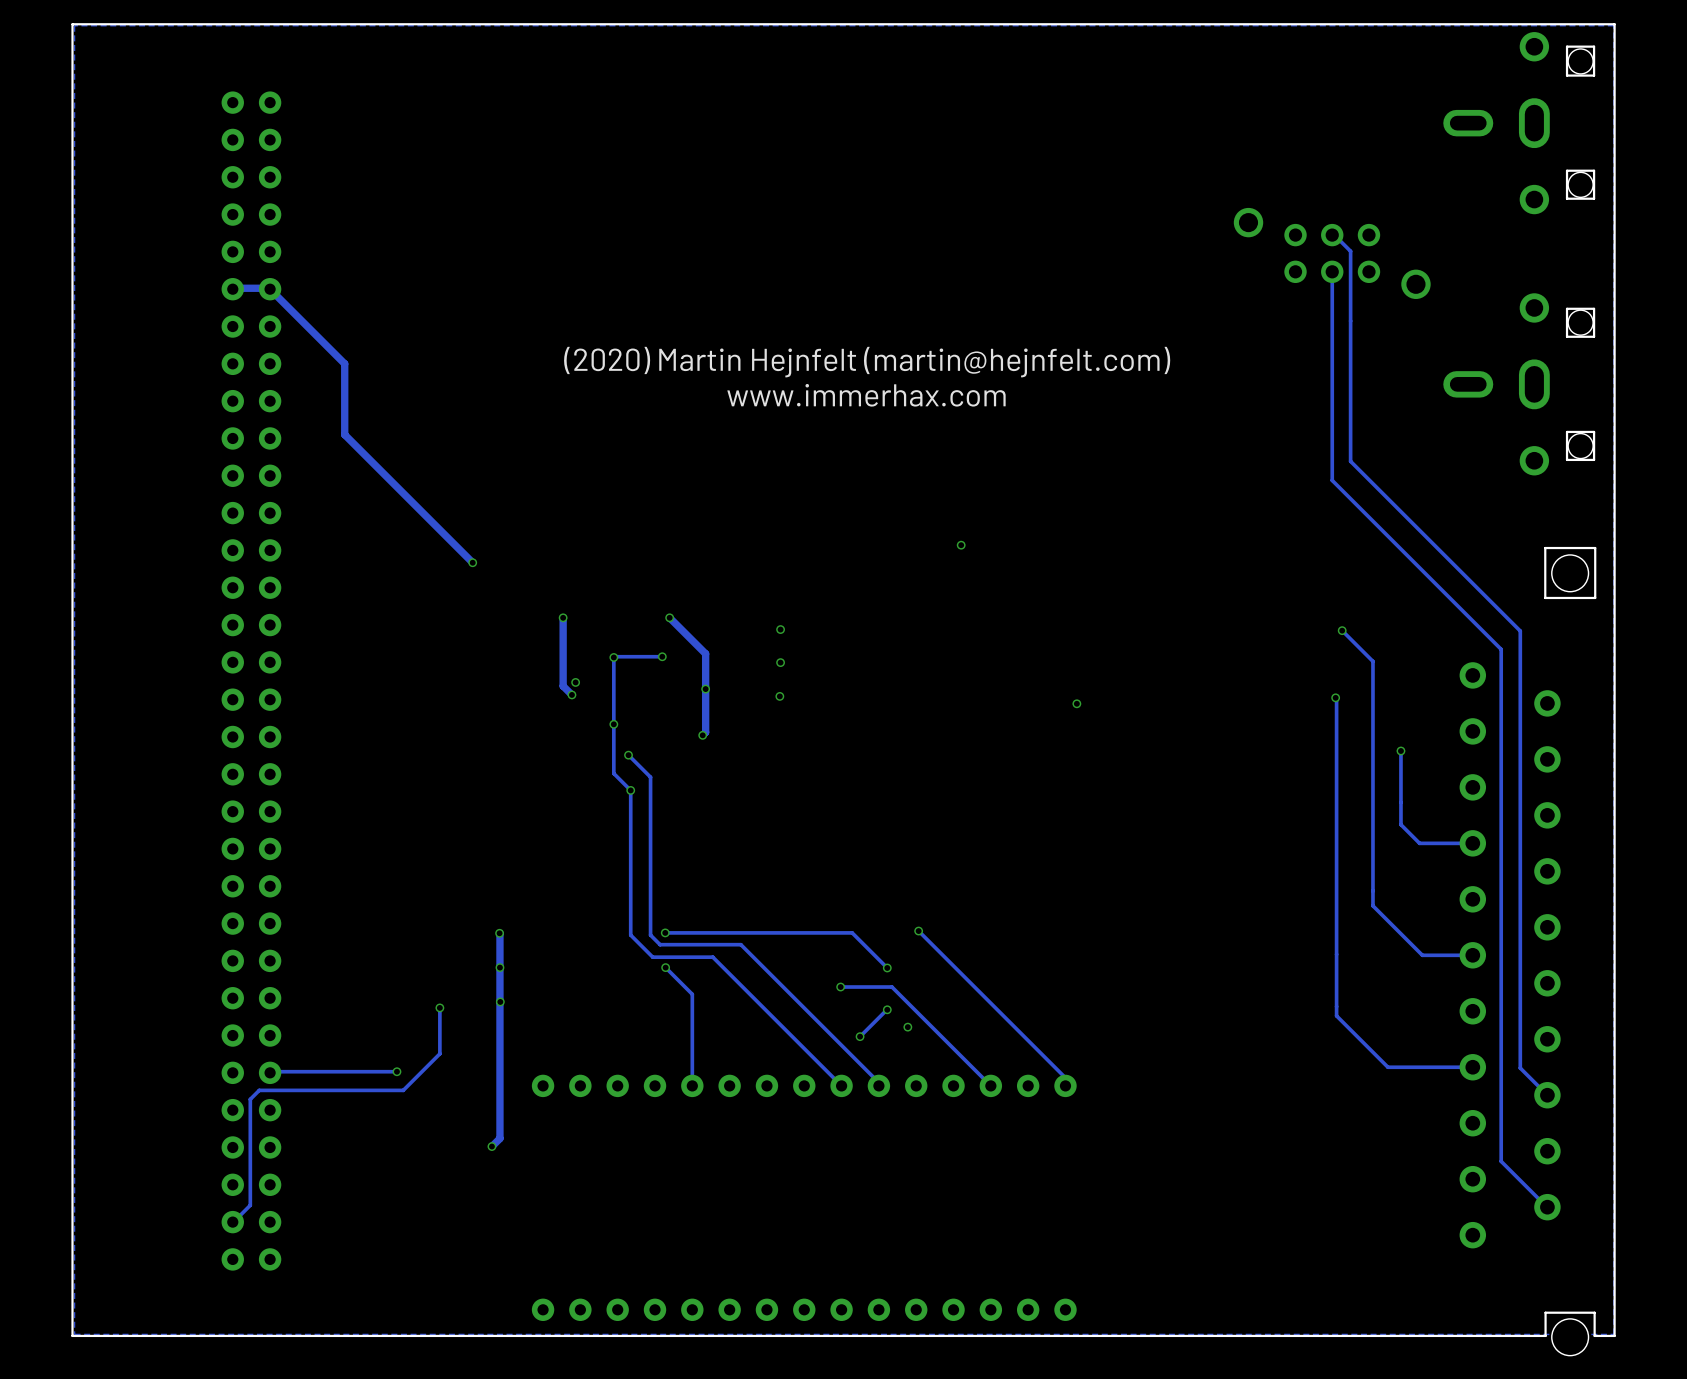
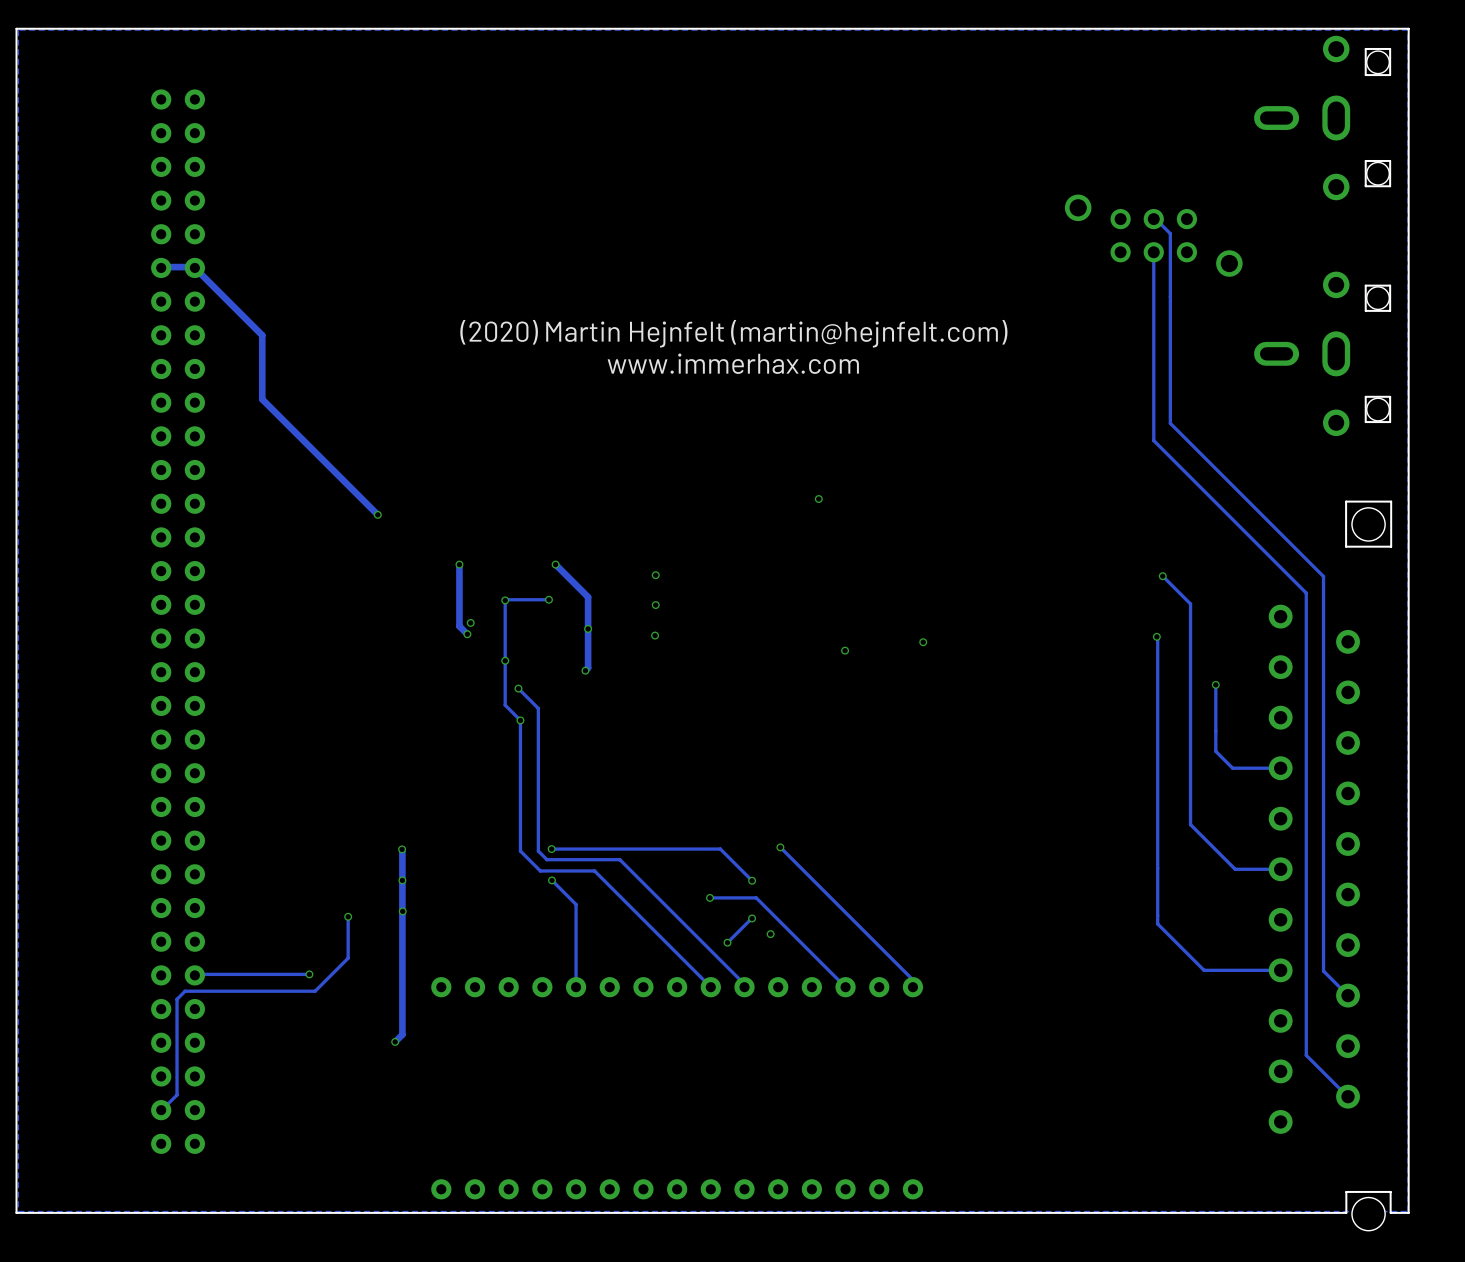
via: none -> (845, 650)

